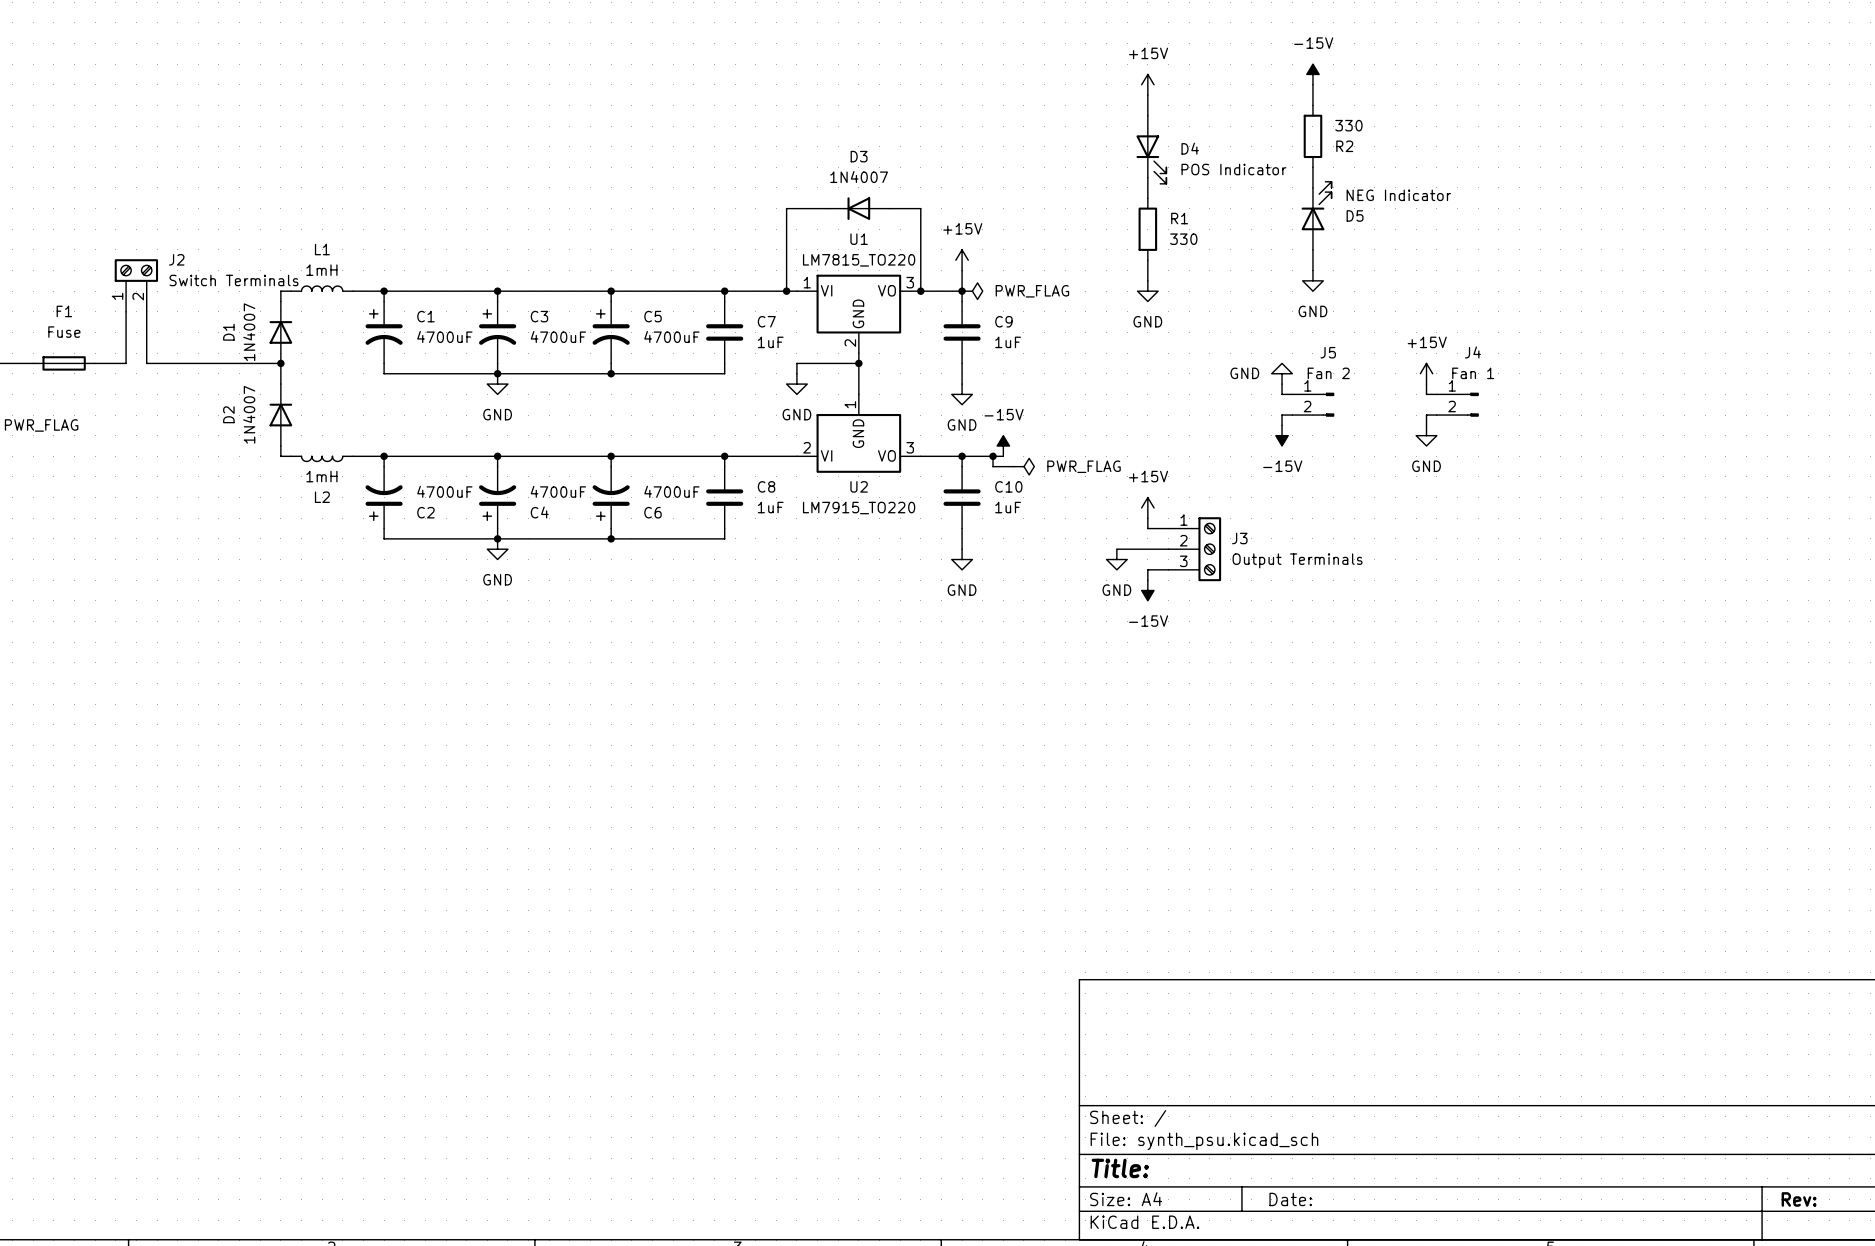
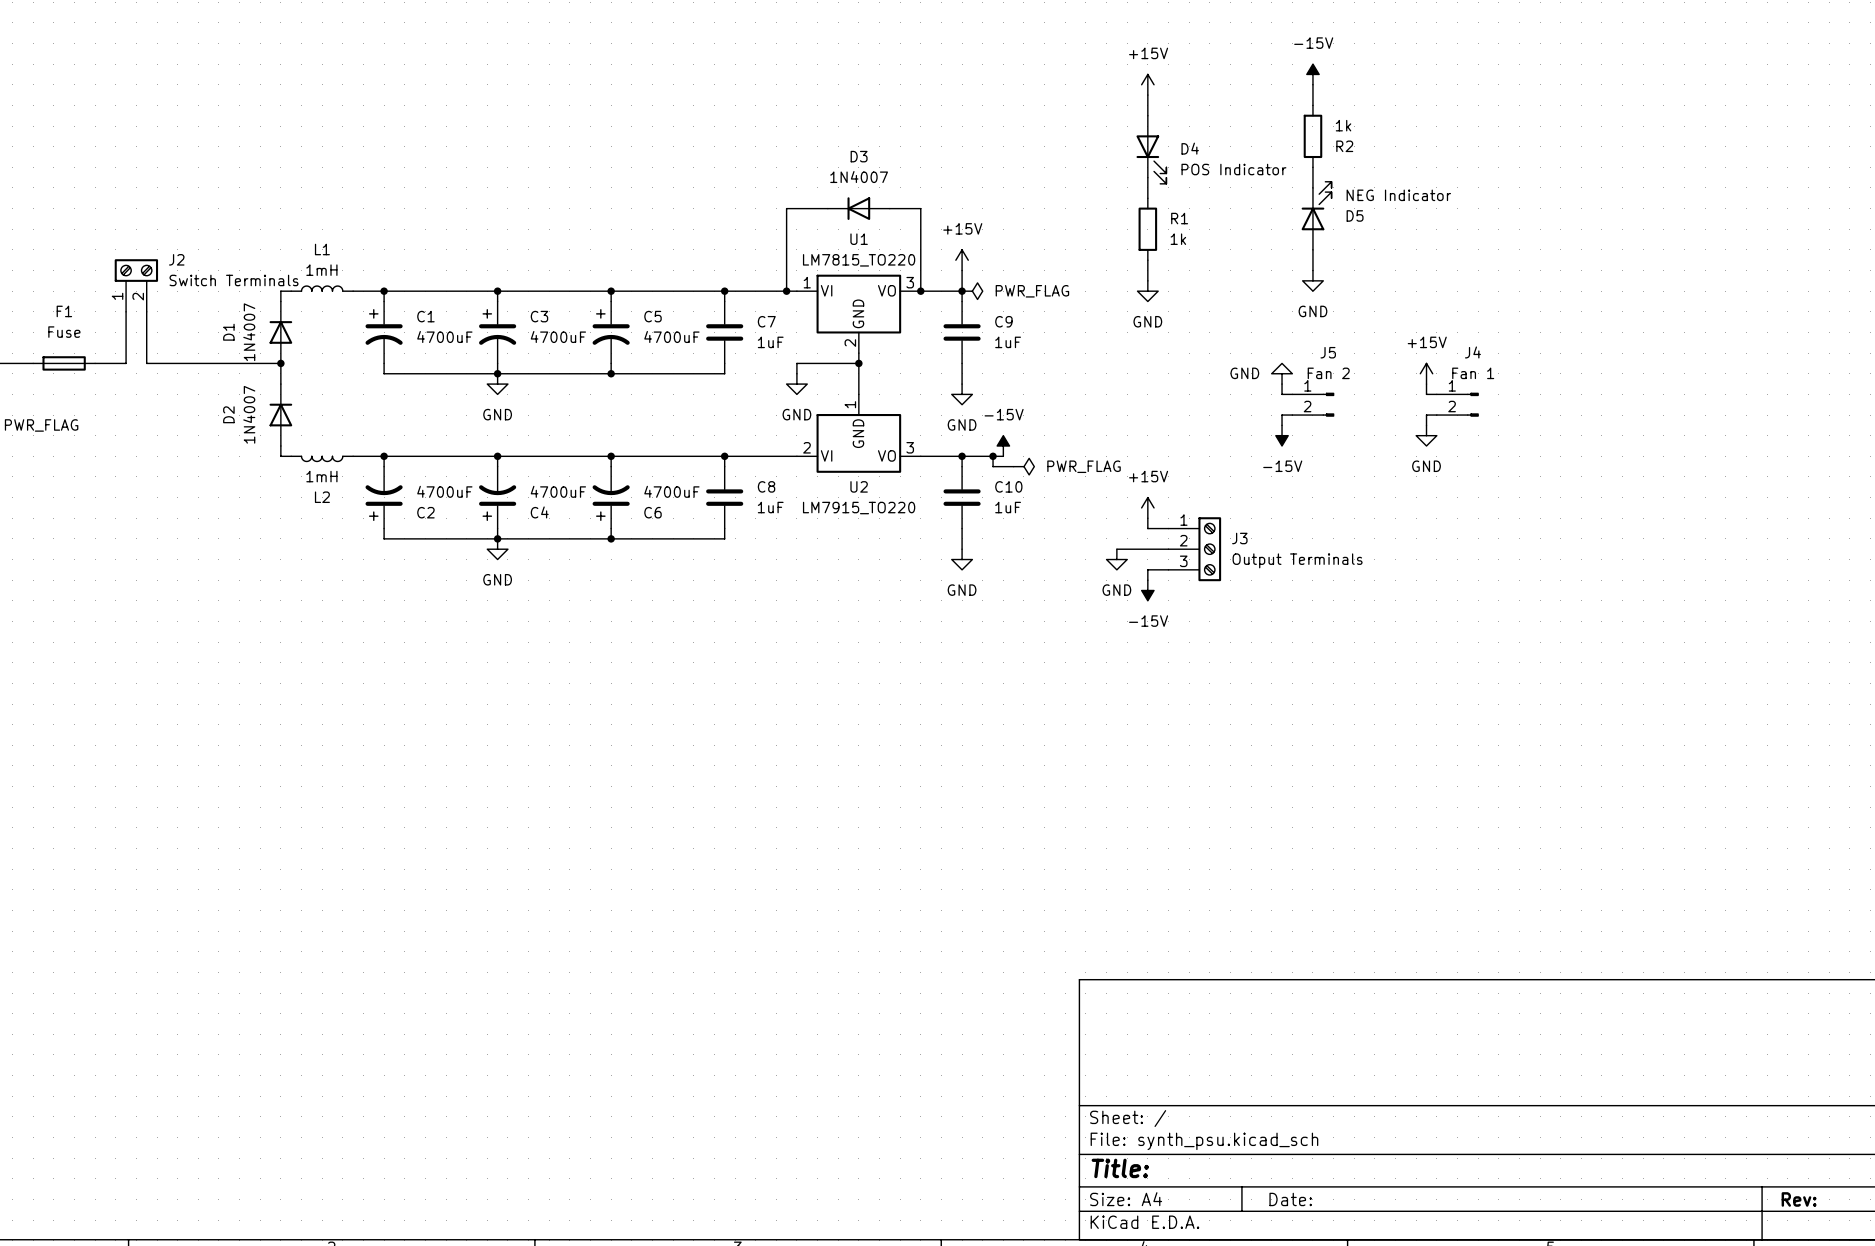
R2 value: 330 (1348, 125) -> 1k (1343, 125)
R1 value: 330 (1183, 239) -> 1k (1178, 239)

